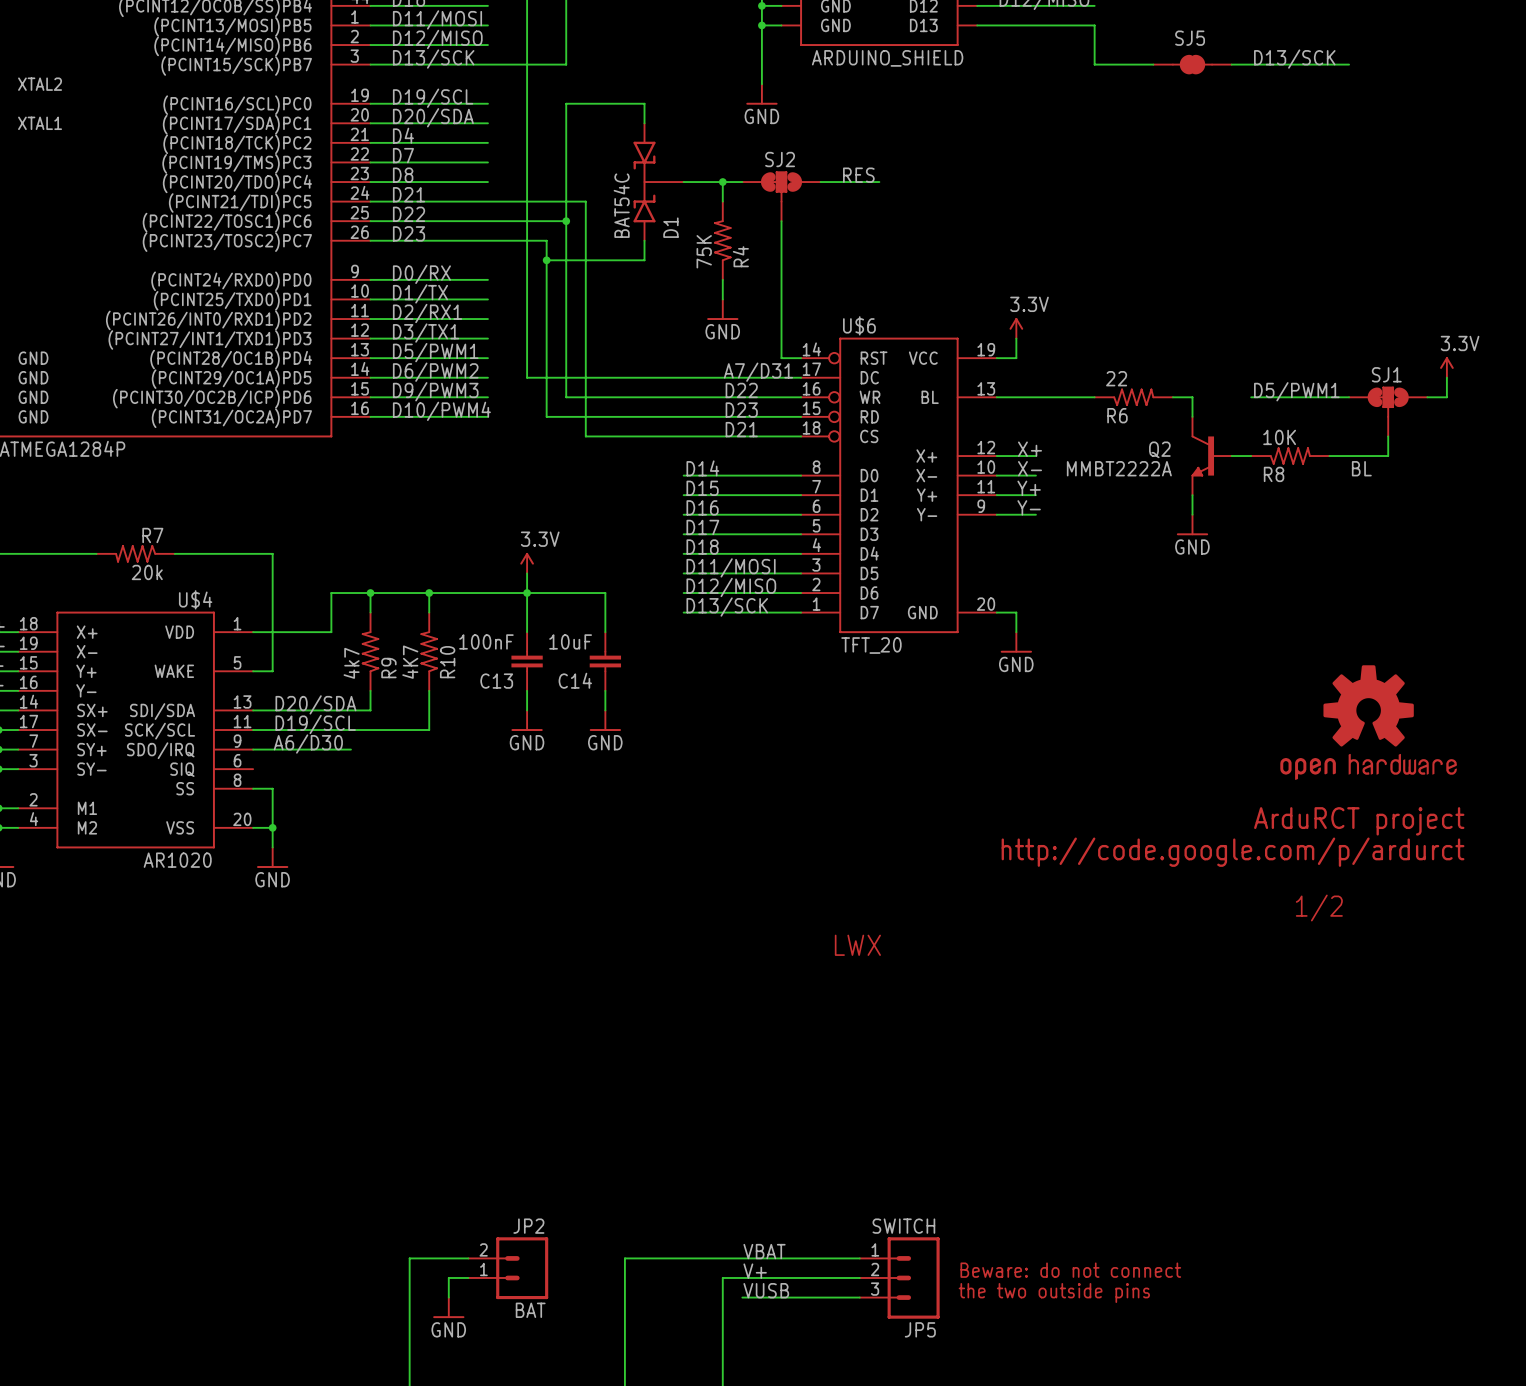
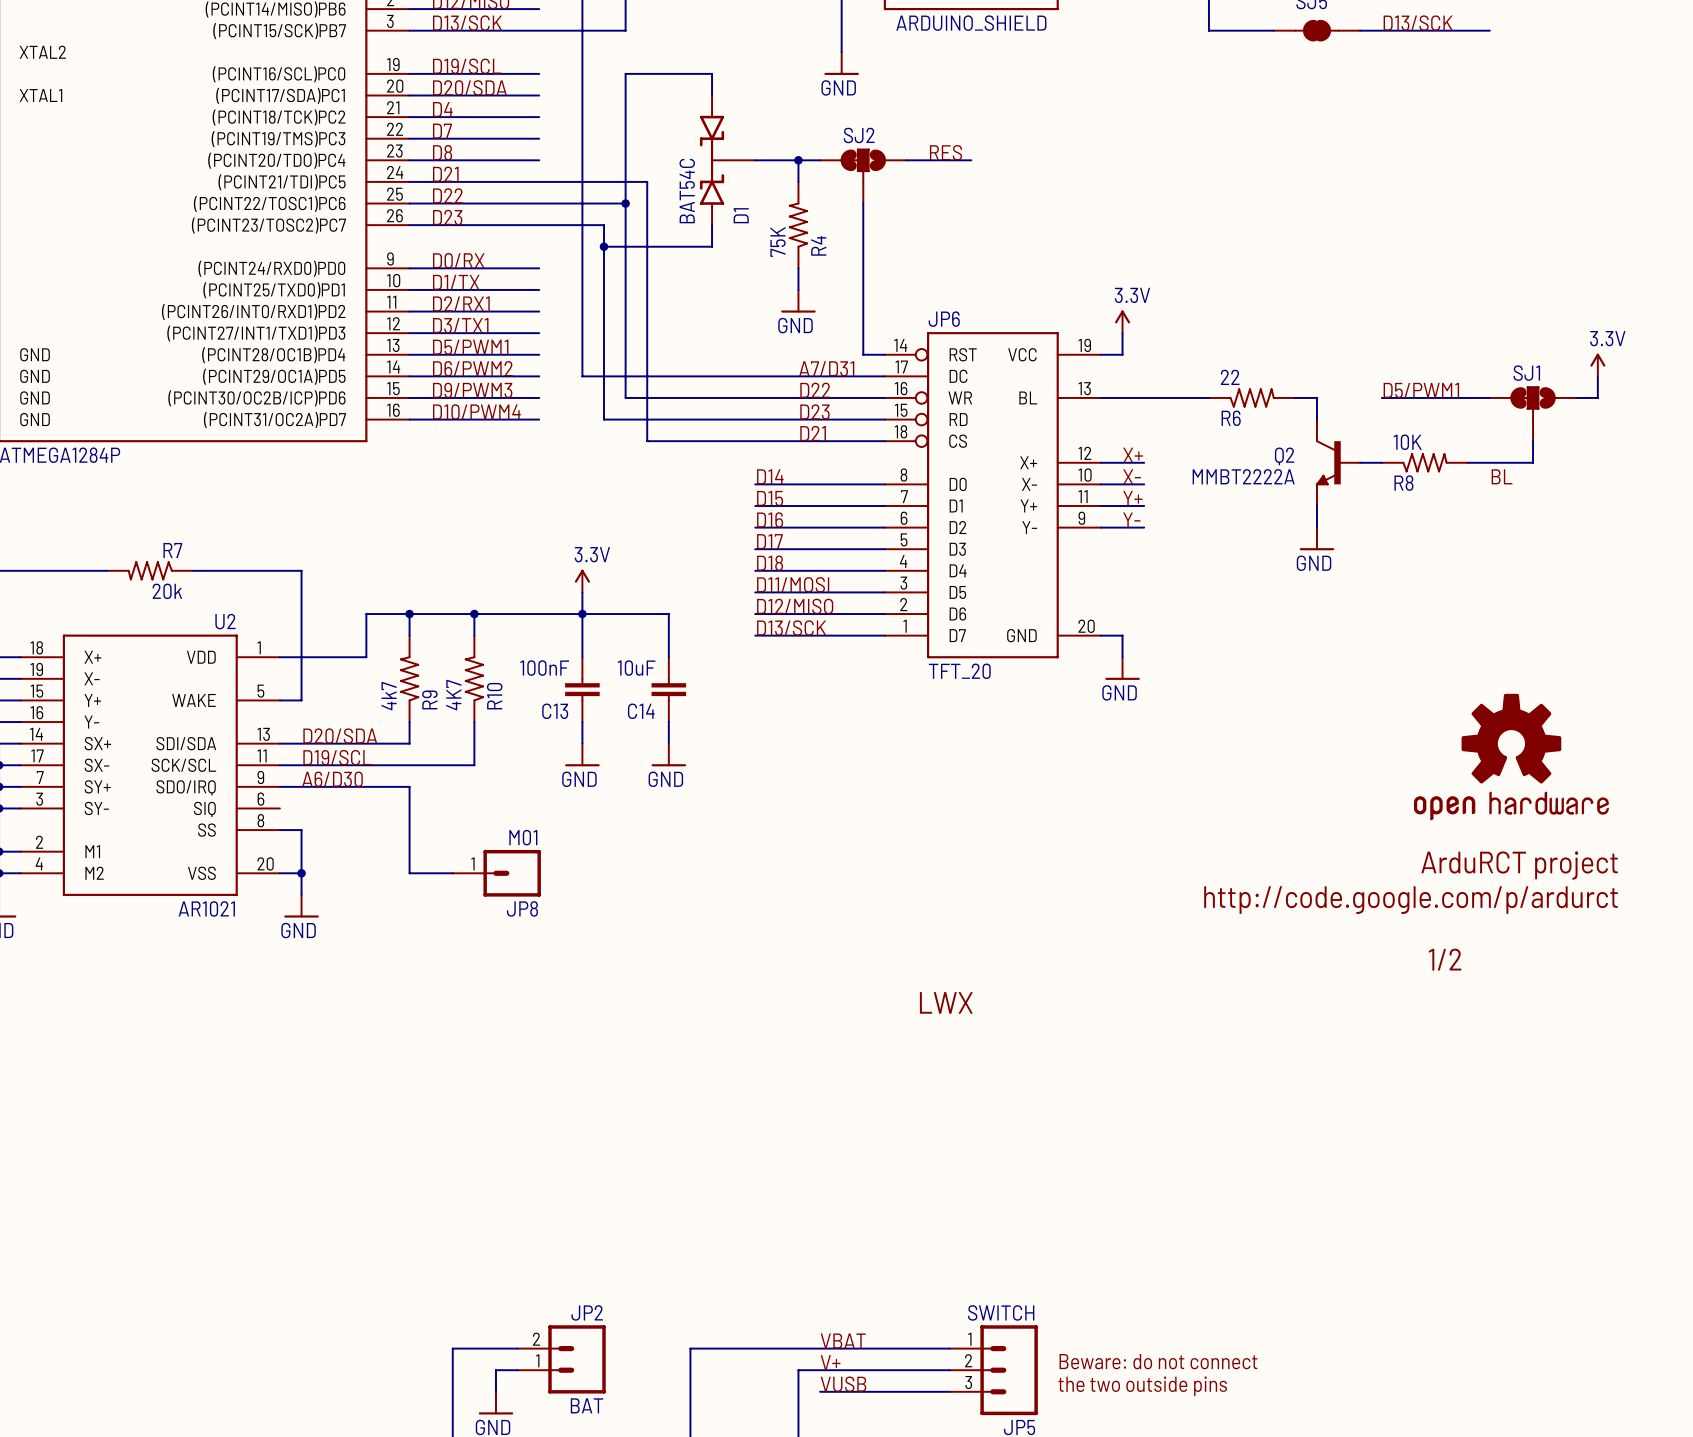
U$6 name: U$6 (859, 325) -> JP6 (944, 319)
U$4 name: U$4 (195, 599) -> U2 (225, 621)
wire: none -> (387, 786) (409, 786) (409, 873) (452, 873)
JP8: none -> M01 (496, 873)
U$4 value: AR1020 (177, 860) -> AR1021 (206, 908)

